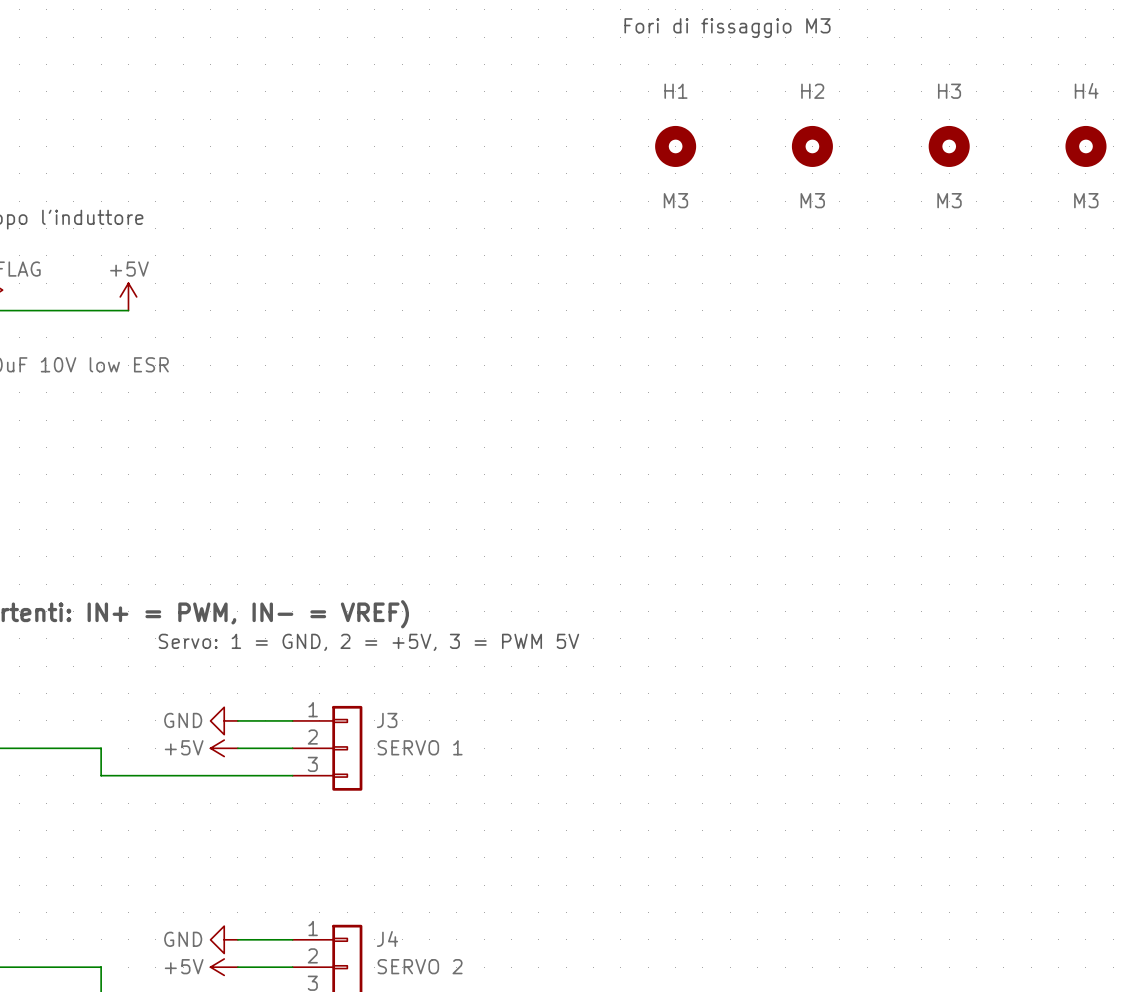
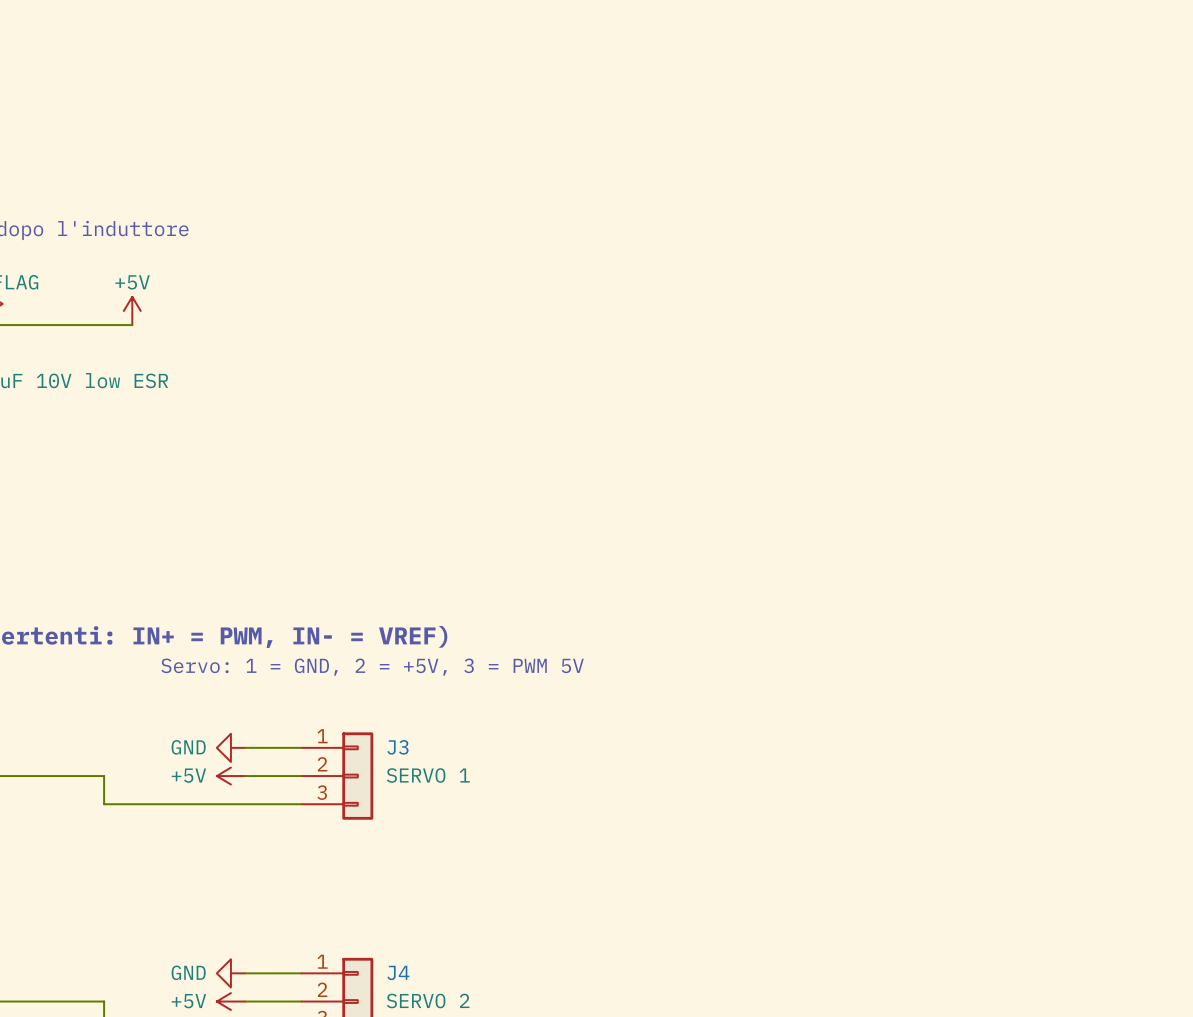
text: Fori di fissaggio M3 (727, 28) -> none
H1: M3 (675, 146) -> none
H2: M3 (812, 146) -> none
H3: M3 (949, 146) -> none
H4: M3 (1085, 146) -> none

